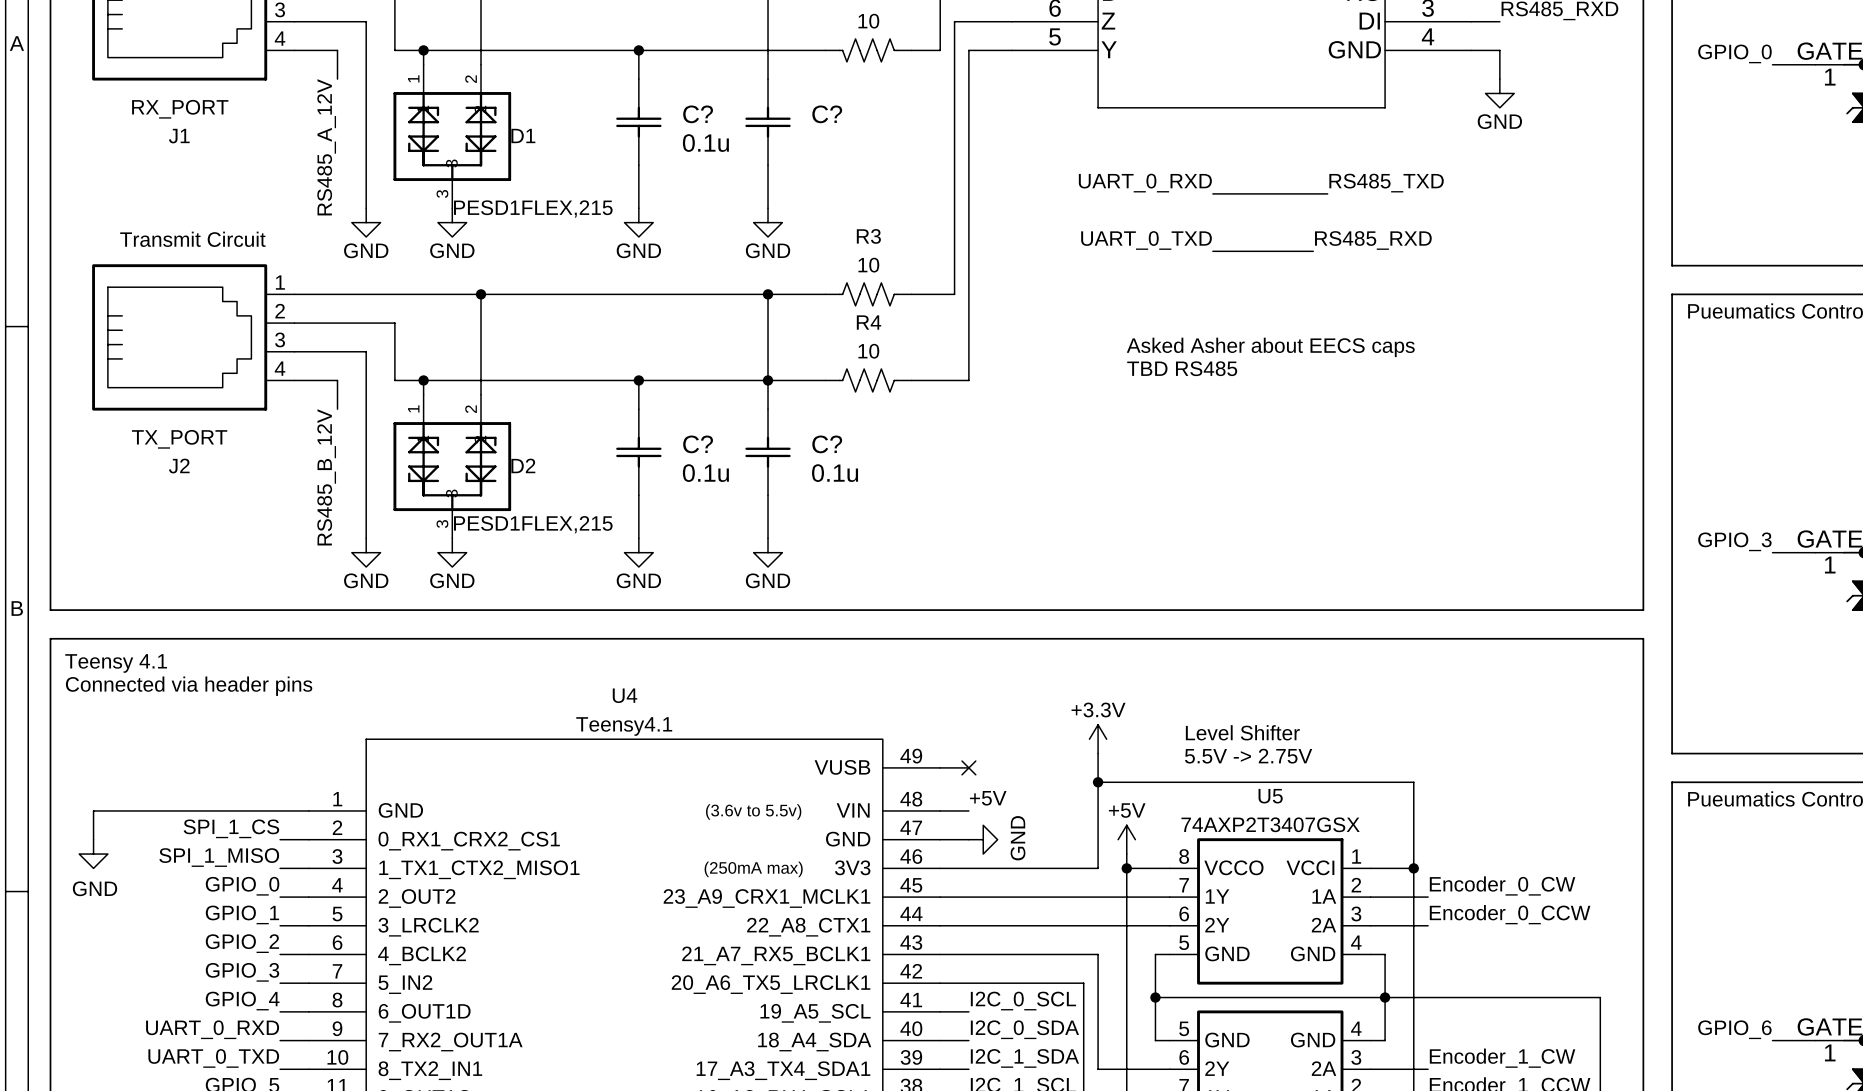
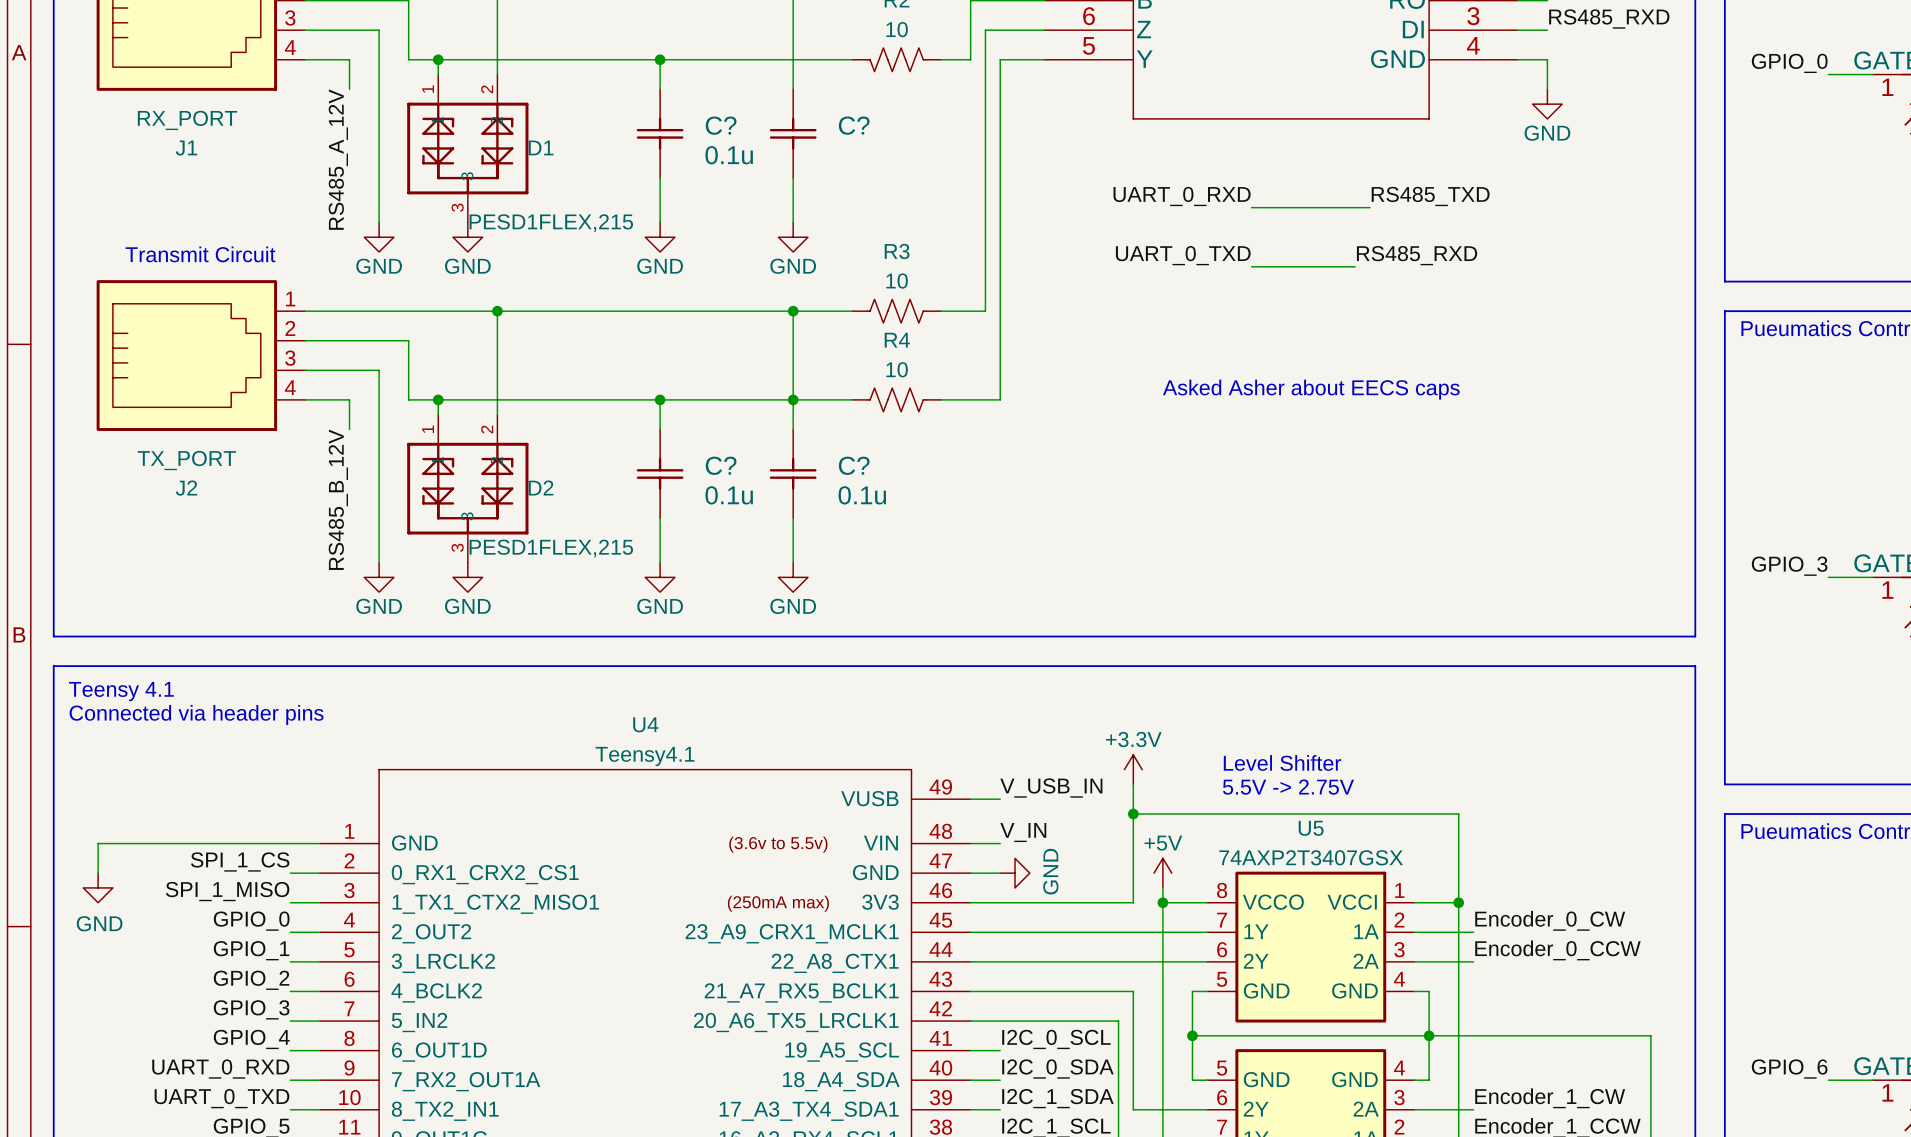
text: Asked Asher about EECS caps (1270, 347) -> none
text: TBD RS485 (1182, 368) -> Asked Asher about EECS caps (1311, 389)
label: none -> V_USB_IN (1051, 788)
no-connect mark: (968, 767) -> none
label: +5V (988, 798) -> V_IN (1023, 832)

